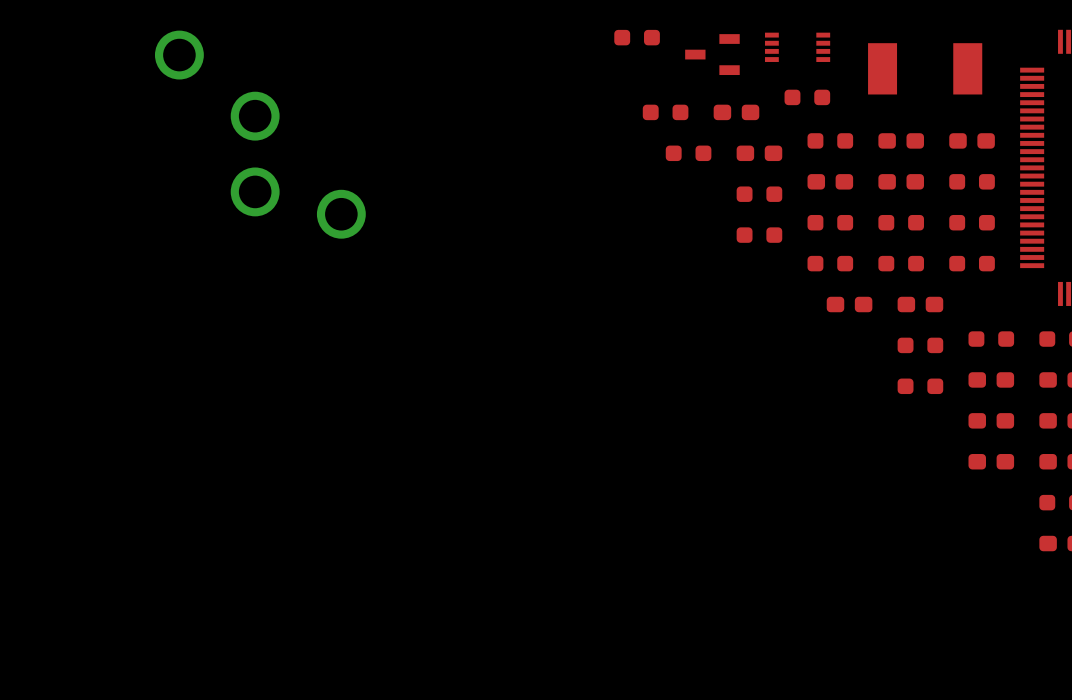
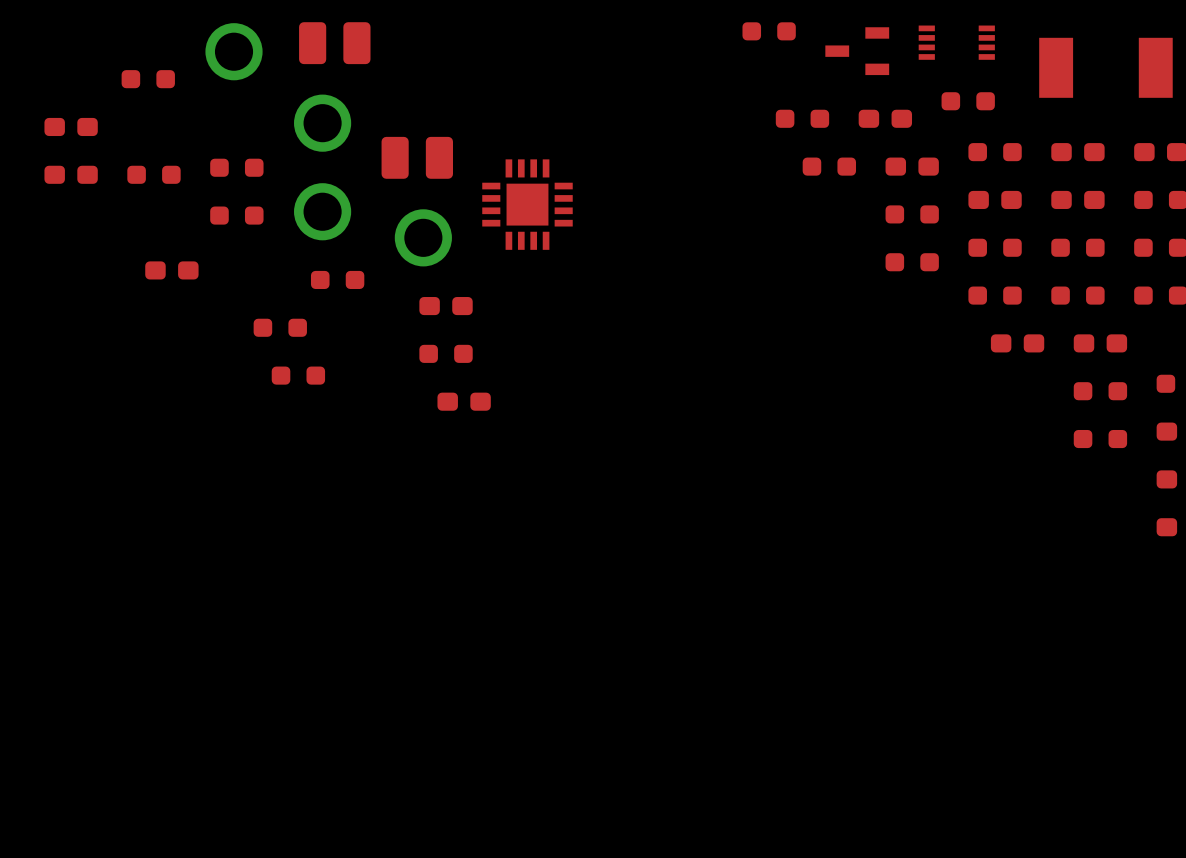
part: none -> (334, 43)
part: none -> (148, 79)
part: none -> (71, 126)
part: none -> (417, 157)
part: none -> (236, 167)
part: none -> (71, 174)
part: none -> (153, 174)
part: none -> (527, 204)
part: none -> (236, 215)
part: none -> (171, 270)
part: none -> (337, 279)
part: none -> (446, 306)
part: none -> (280, 327)
part: none -> (446, 353)
part: none -> (298, 375)
part: none -> (464, 401)

